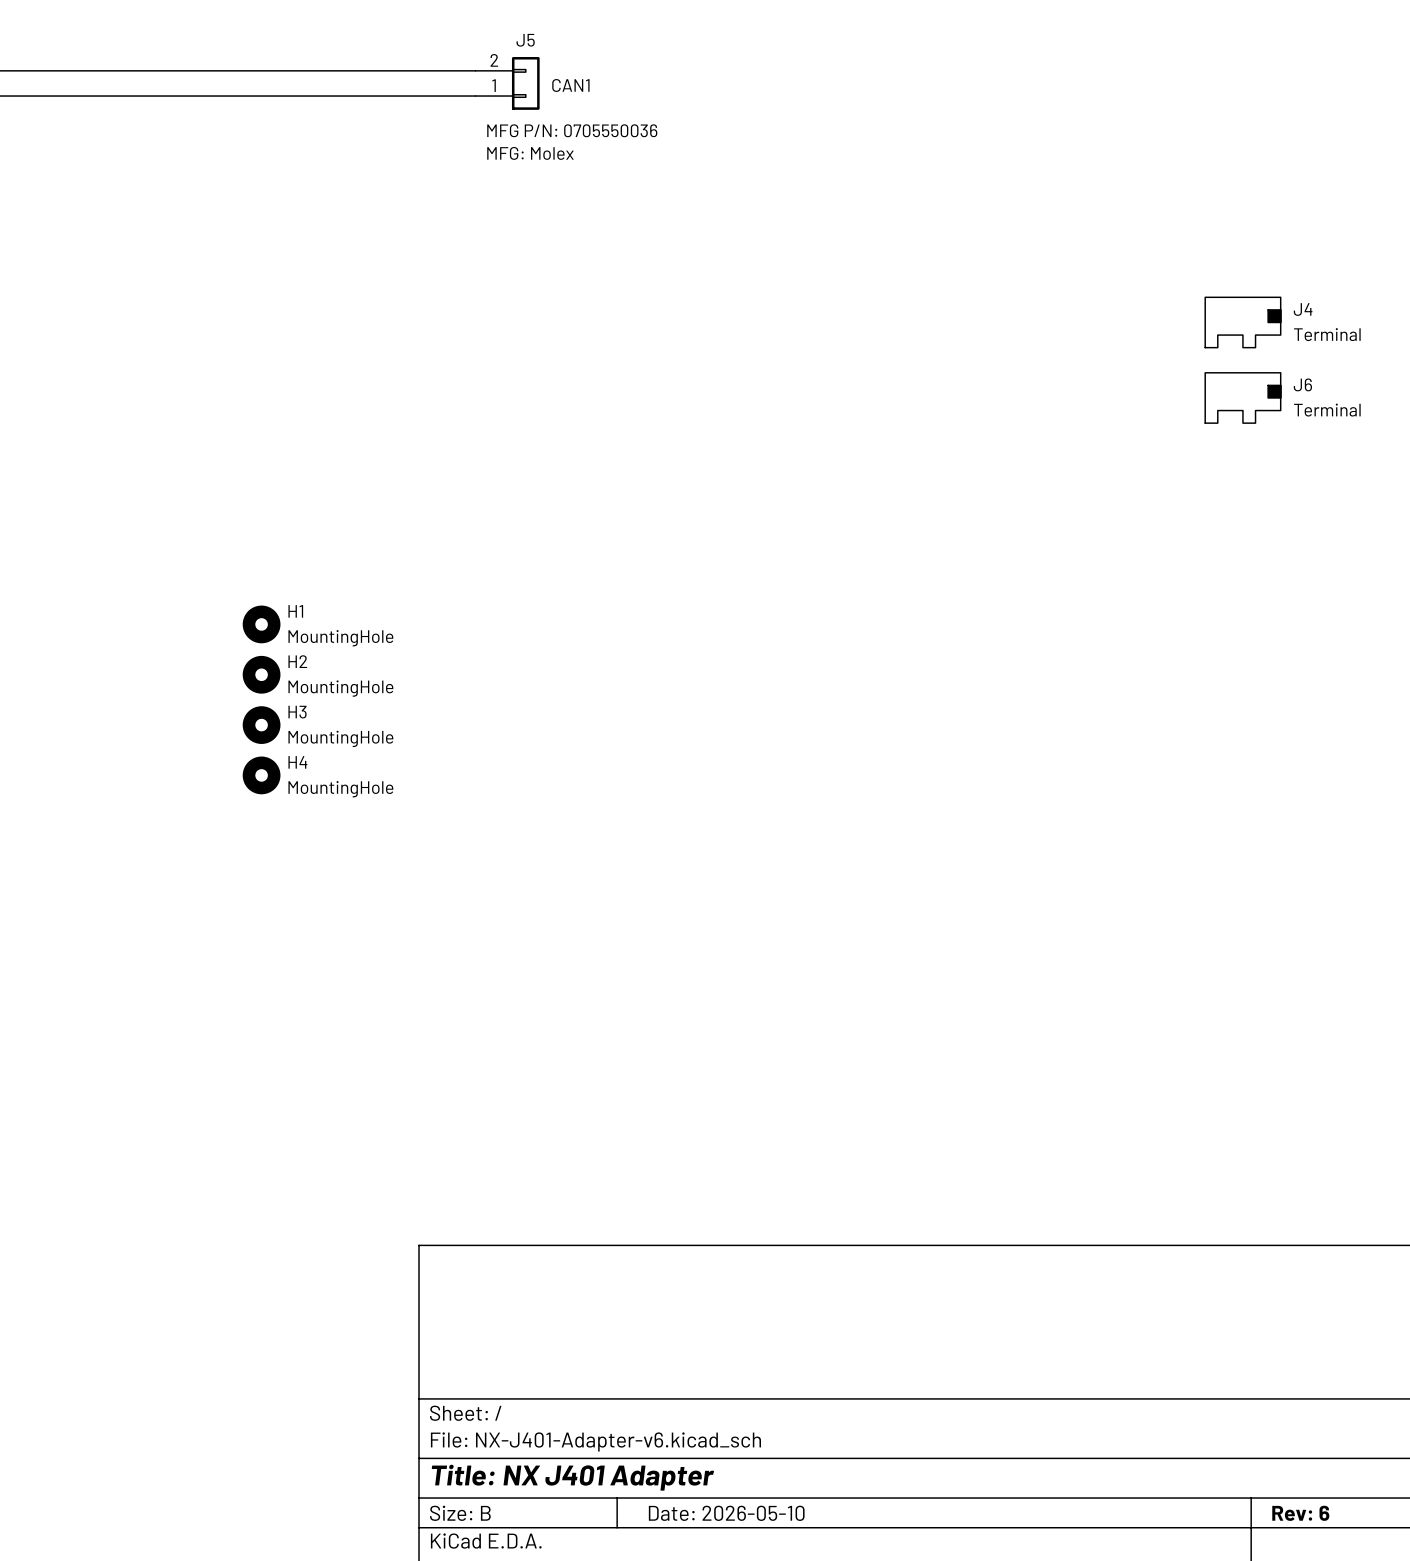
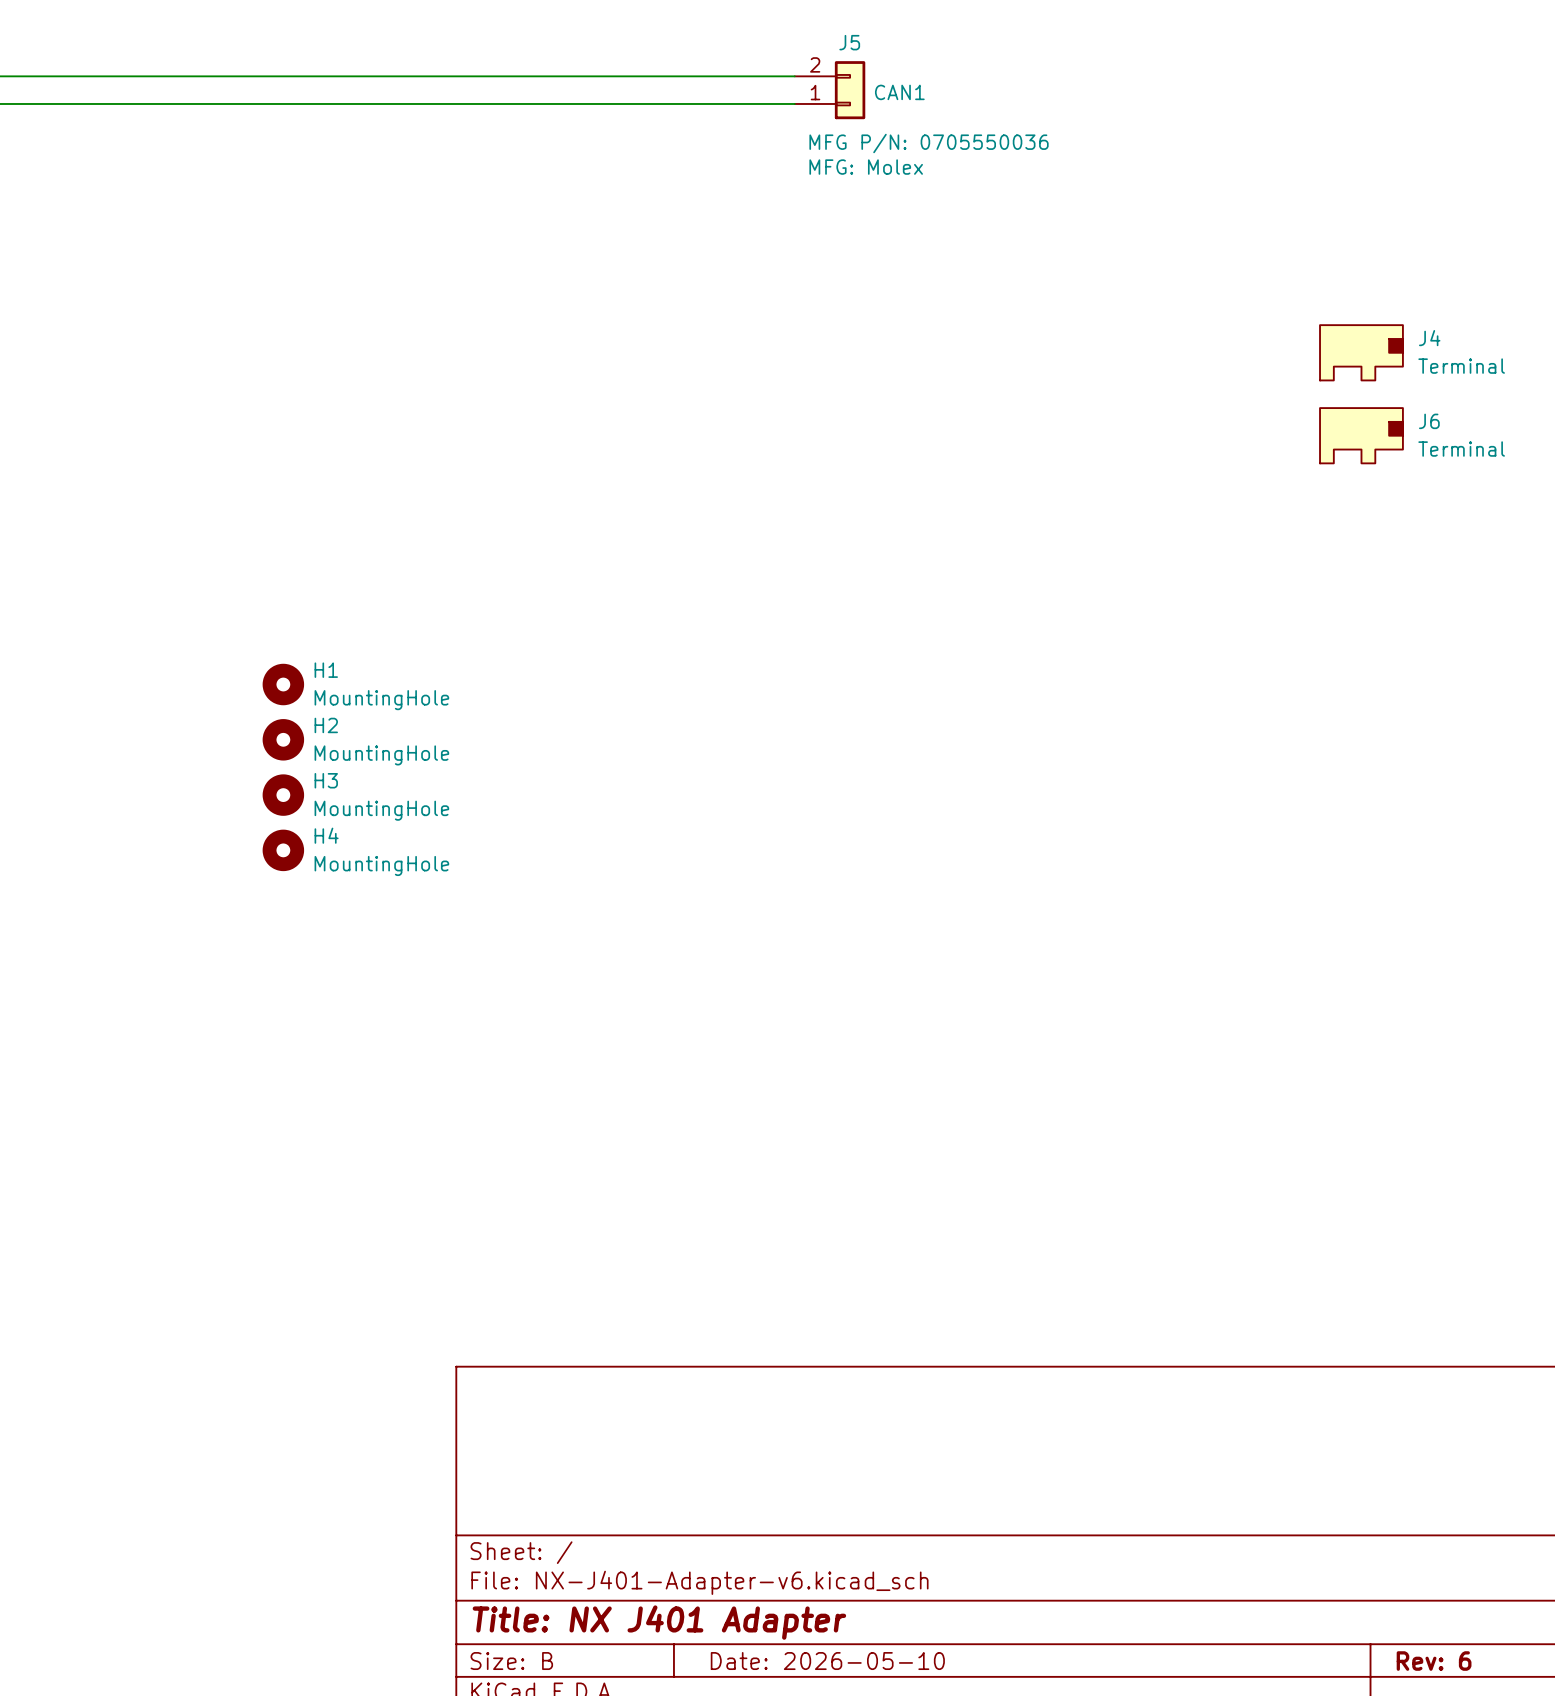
wire: none -> (518, 76) (794, 76)
J5 position: (507, 83) -> (830, 90)
wire: none -> (518, 103) (794, 103)

